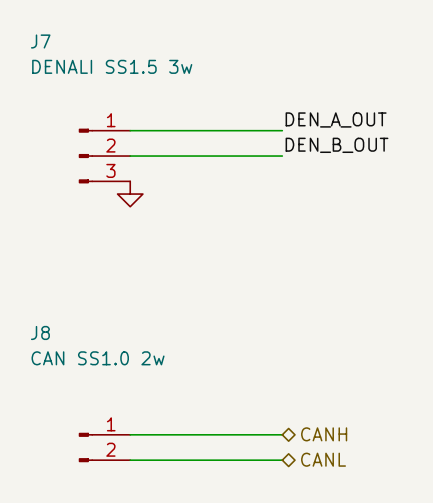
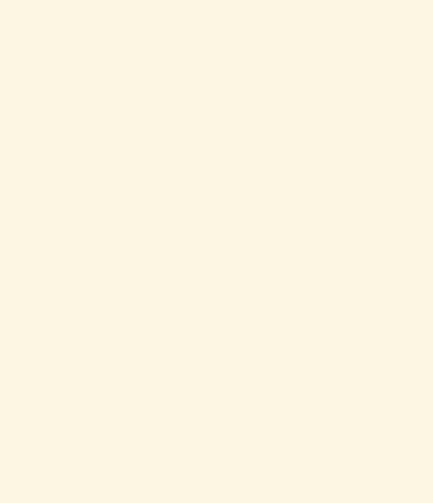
label: DEN_A_OUT (336, 119) -> none
wire: (130, 130) (282, 130) -> none
label: DEN_B_OUT (337, 145) -> none
J7: DENALI SS1.5 3w (104, 156) -> none
wire: (130, 156) (282, 156) -> none
power symbol: (130, 194) -> none
wire: (130, 434) (282, 434) -> none
hierarchical label: CANH (324, 434) -> none
J8: CAN SS1.0 2w (104, 447) -> none
hierarchical label: CANL (323, 459) -> none
wire: (130, 460) (282, 460) -> none

